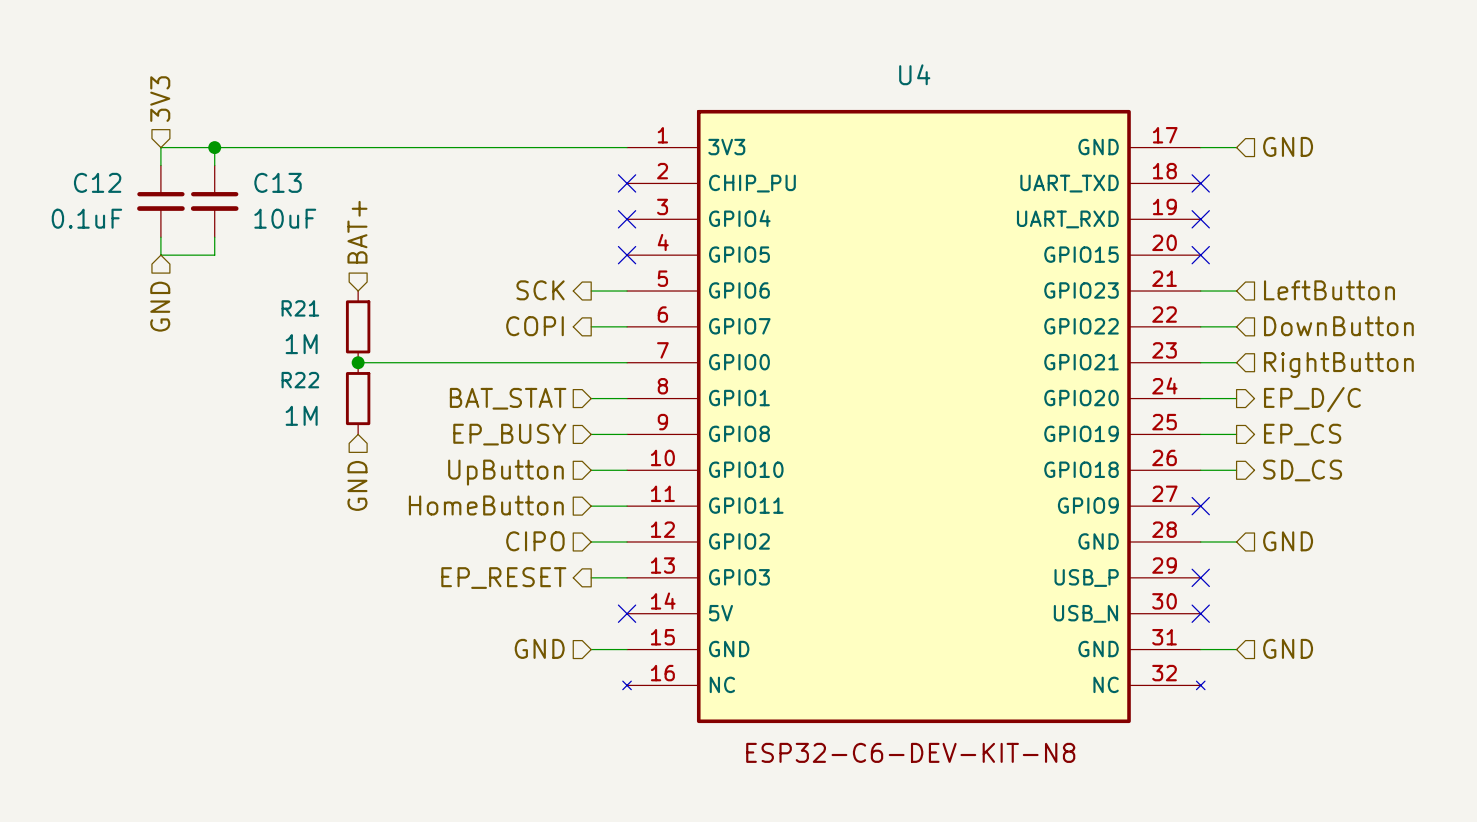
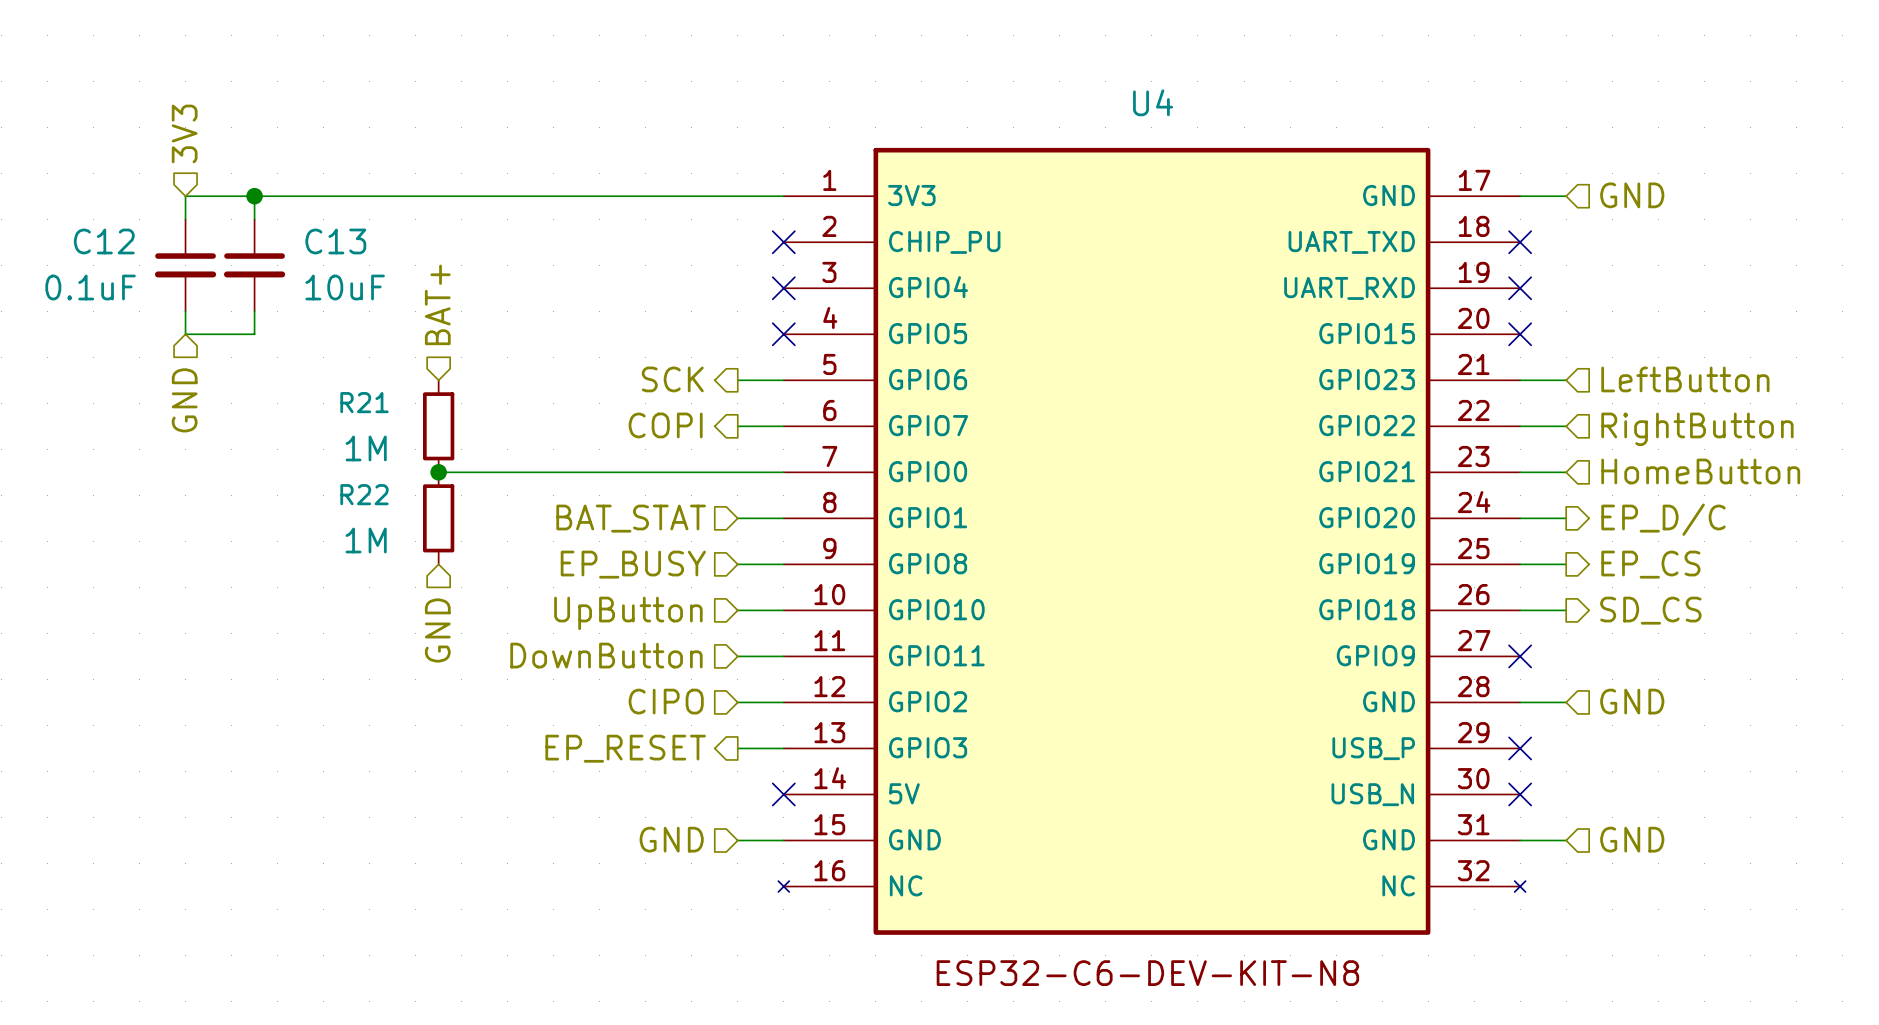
hierarchical label: DownButton (1338, 326) -> RightButton (1697, 429)
hierarchical label: RightButton (1338, 365) -> HomeButton (1700, 471)
hierarchical label: HomeButton (486, 505) -> DownButton (606, 655)

